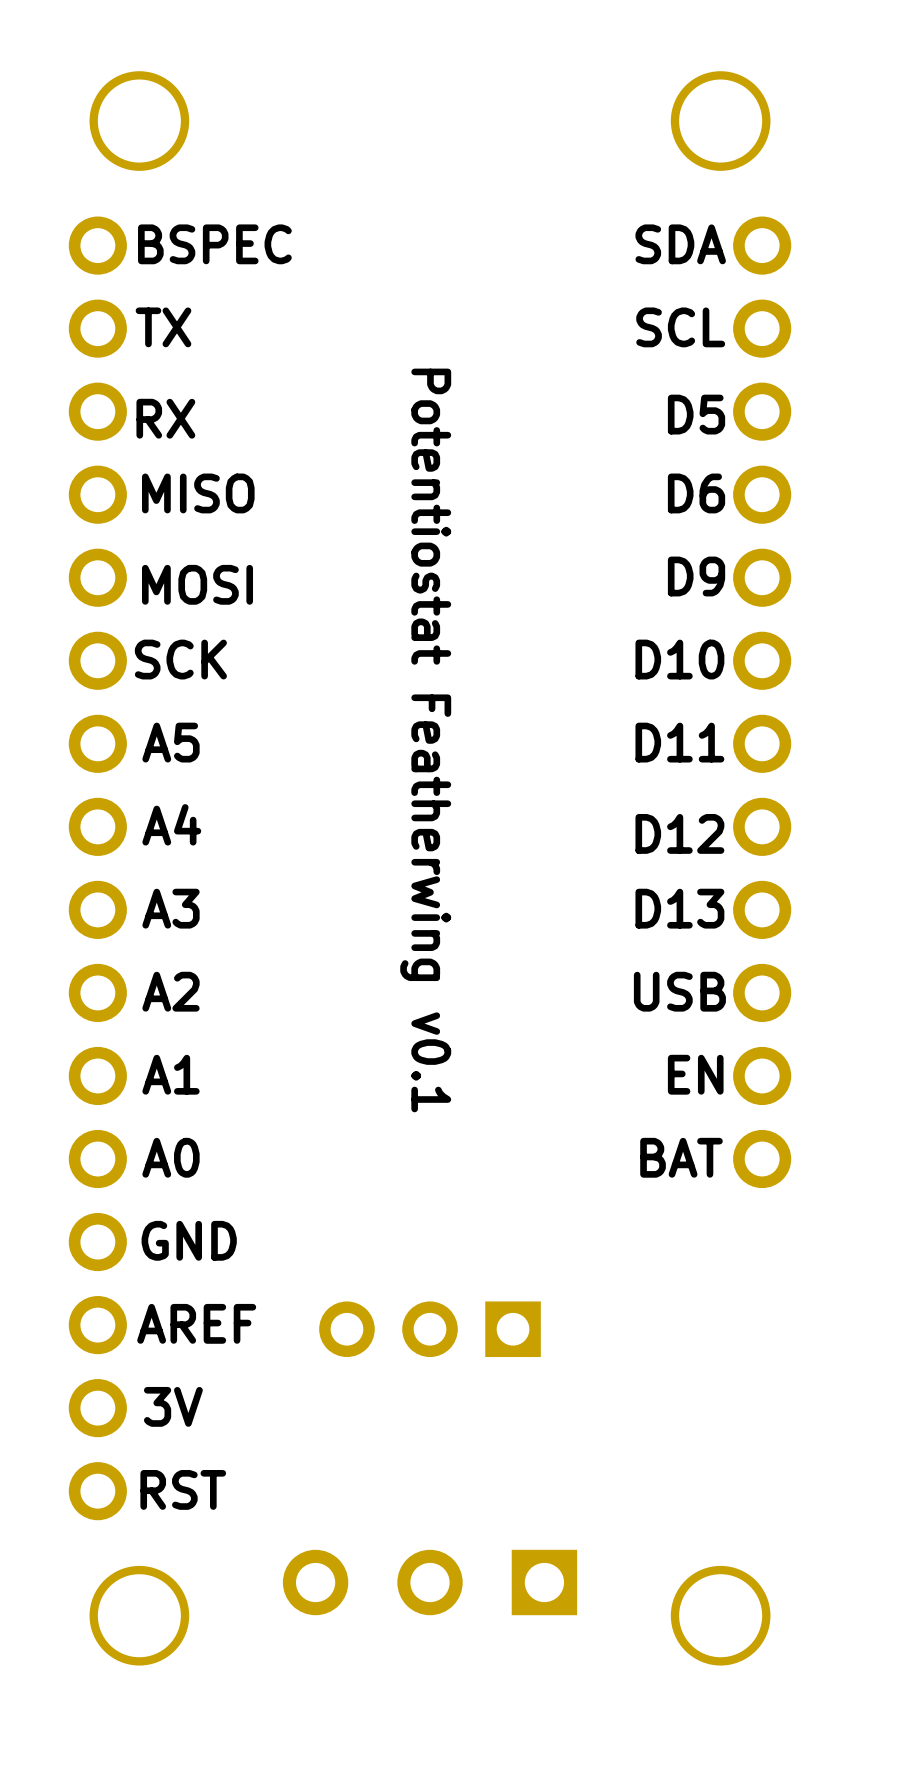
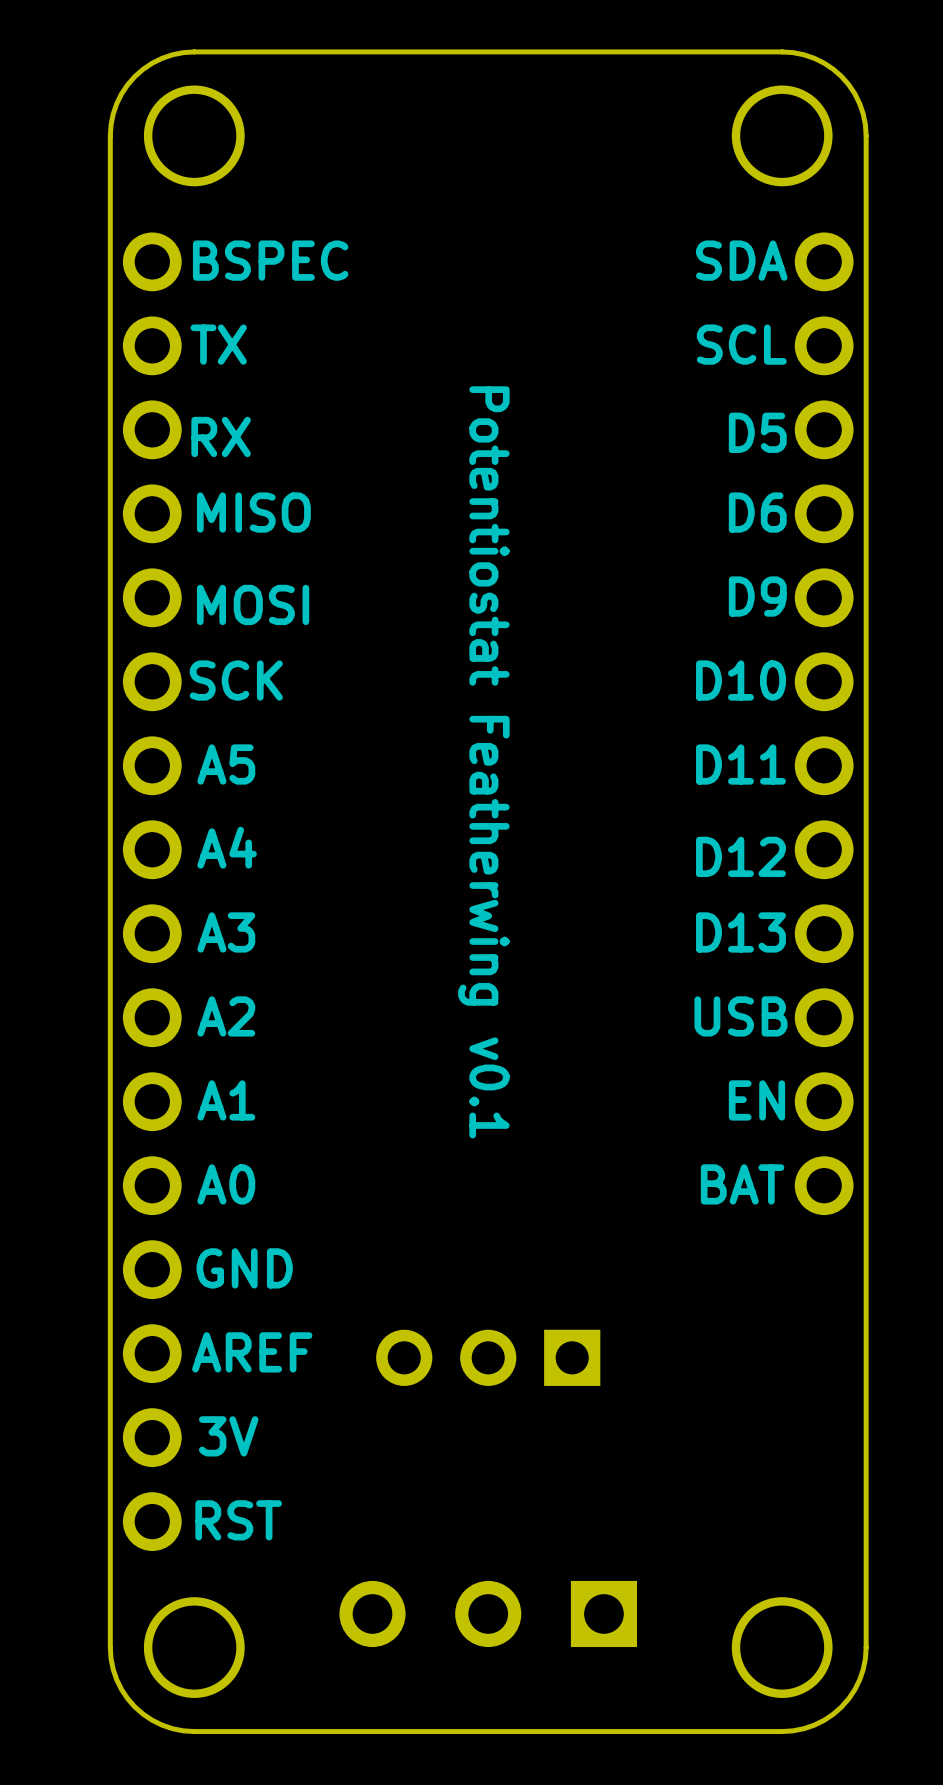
board edge: none -> (782, 51) (183, 52) (162, 58) (143, 69) (127, 84) (116, 103) (110, 135) (110, 1647) (113, 1669) (121, 1689) (134, 1706) (162, 1725) (194, 1731) (782, 1731) (803, 1728) (833, 1714) (848, 1698) (859, 1679) (866, 1647) (866, 135) (859, 103) (841, 76) (814, 58) (782, 51)

